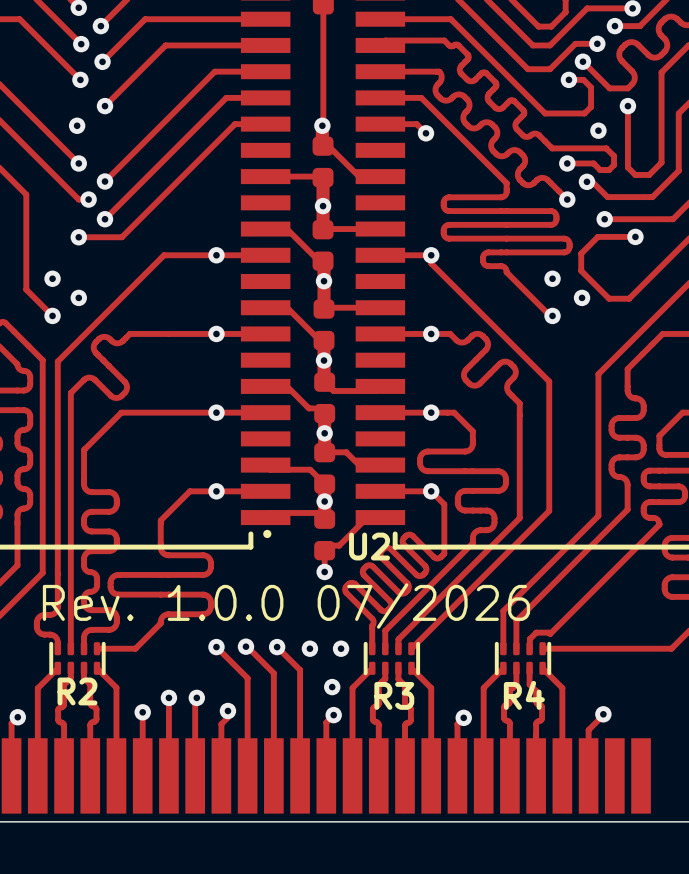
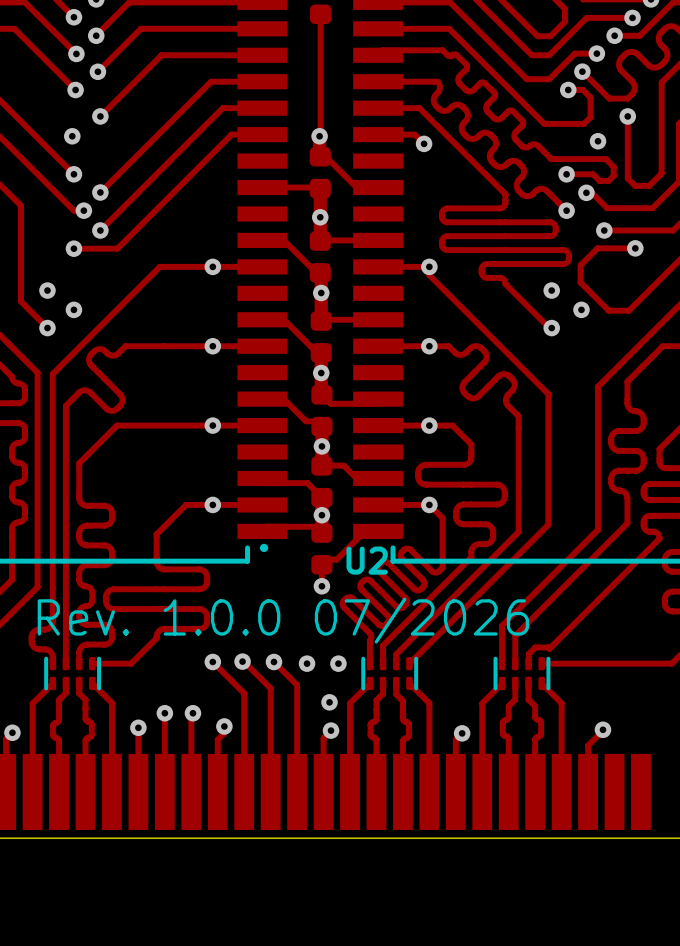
R2 name: R2 (77, 691) -> none
R3 name: R3 (394, 695) -> none
R4 name: R4 (524, 695) -> none

